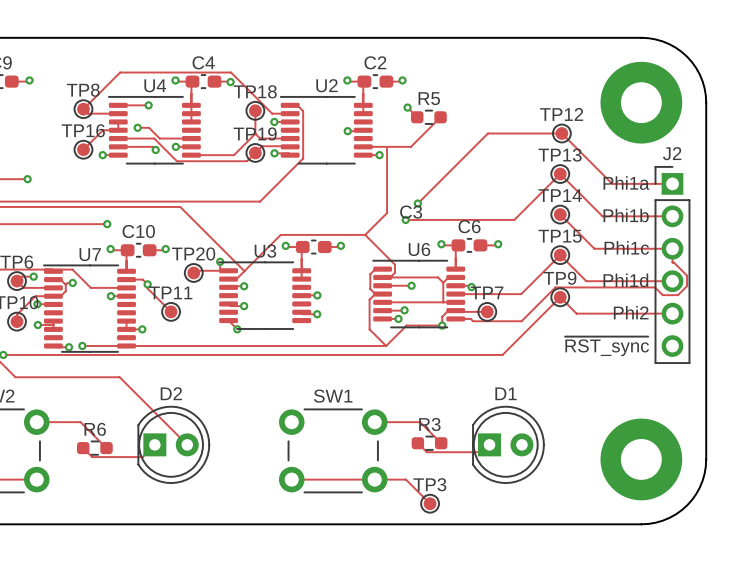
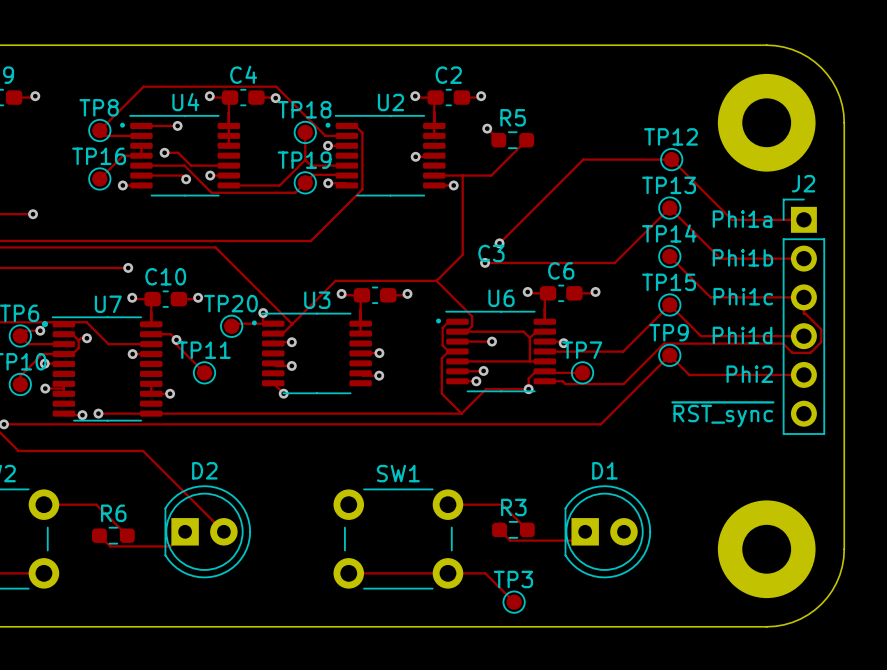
U4 footprint: [108, 96, 201, 165] -> [120, 114, 241, 197]
U2 footprint: [280, 96, 373, 165] -> [325, 114, 446, 197]
U6 footprint: [372, 259, 466, 329] -> [436, 310, 557, 393]
U3 footprint: [218, 261, 312, 330] -> [251, 312, 372, 395]
U7 footprint: [43, 264, 136, 353] -> [41, 316, 163, 422]

